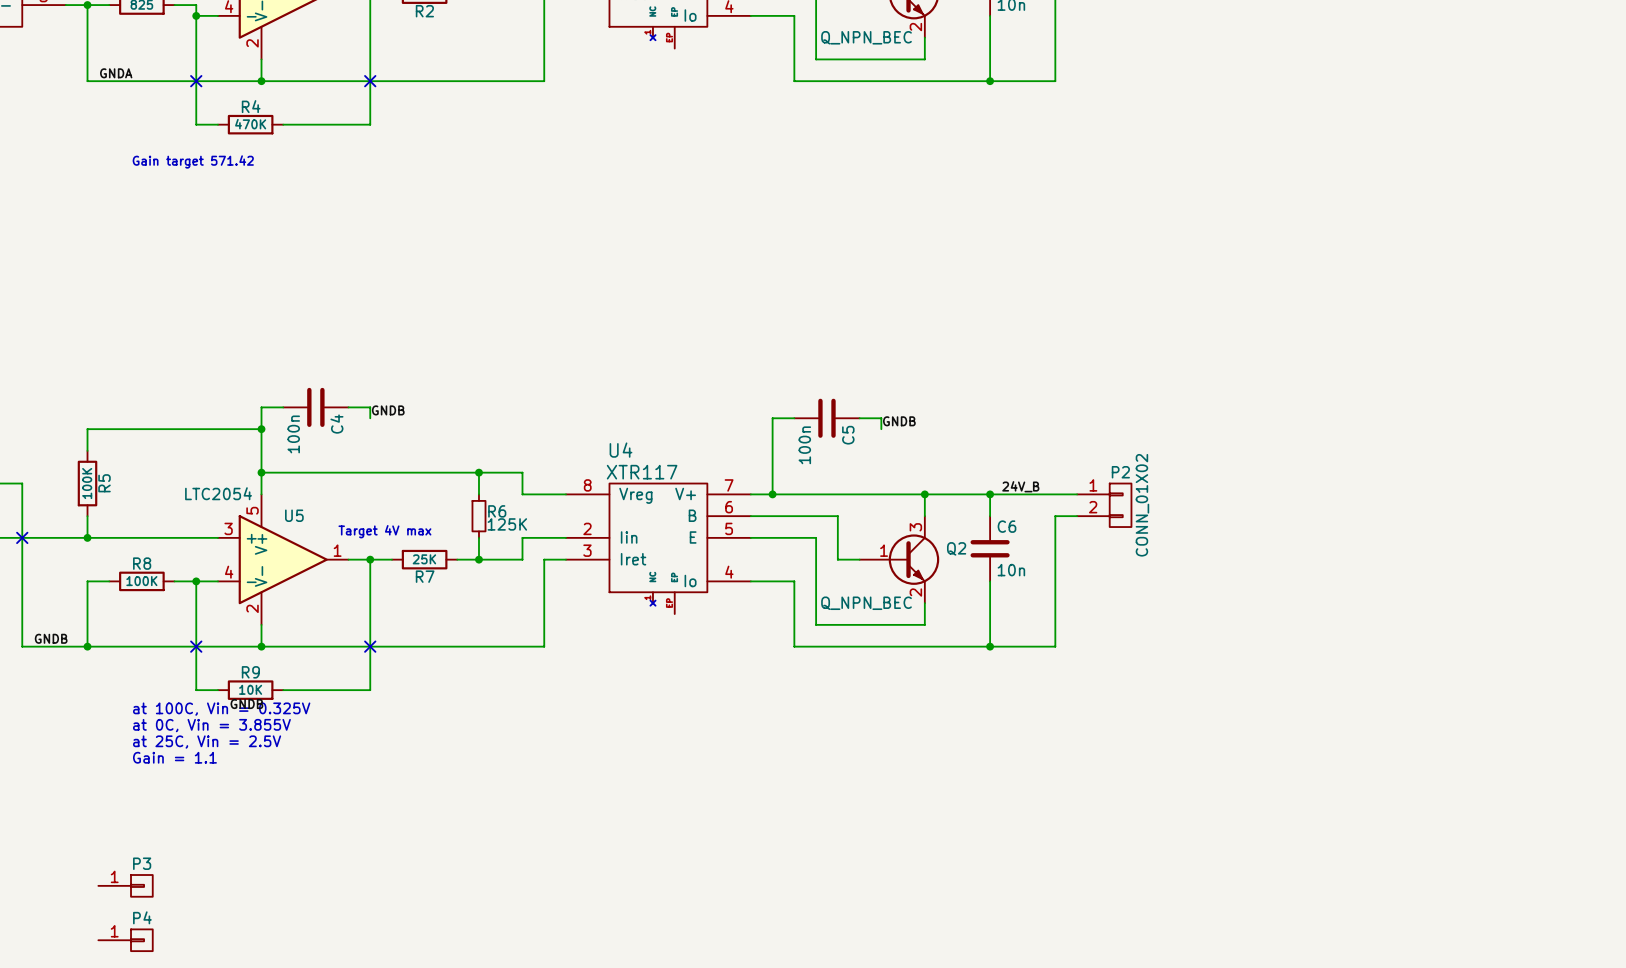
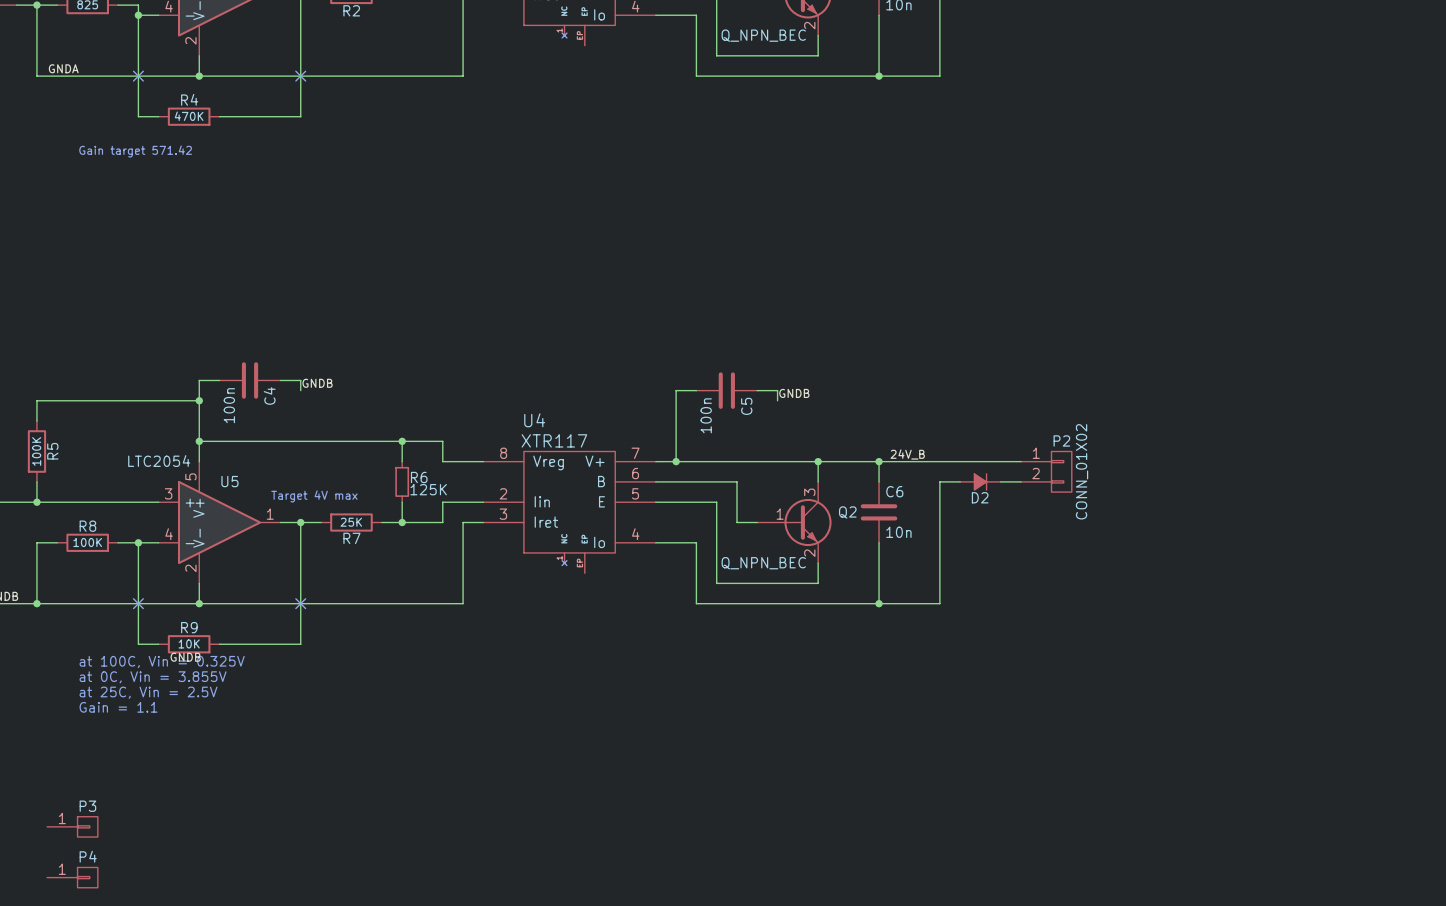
P2 position: (1104, 505) -> (1046, 471)
D2: none -> (980, 481)
wire: none -> (1000, 481) (1021, 481)

